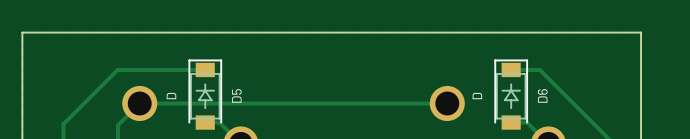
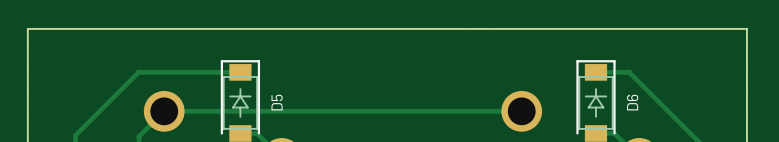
D5 value: D (171, 96) -> none
D6 value: D (477, 96) -> none

